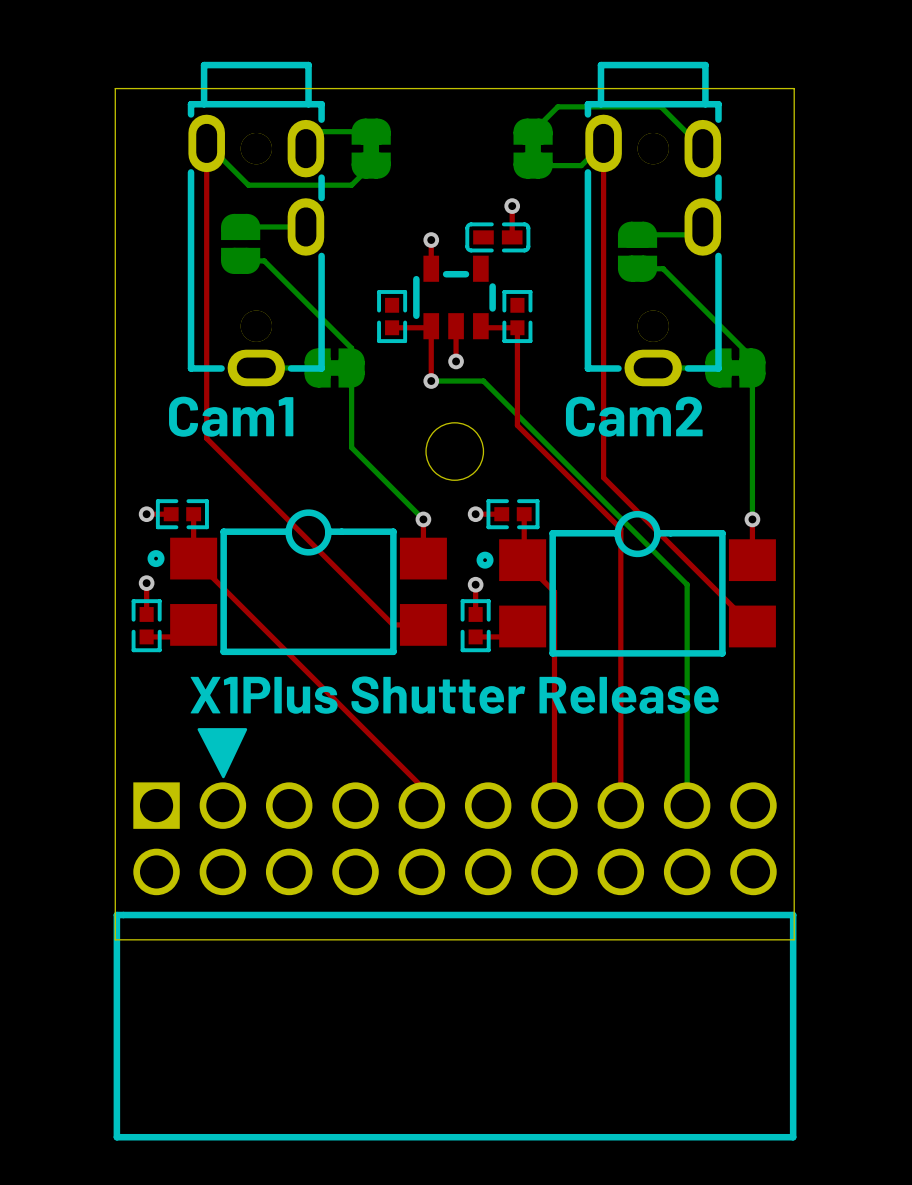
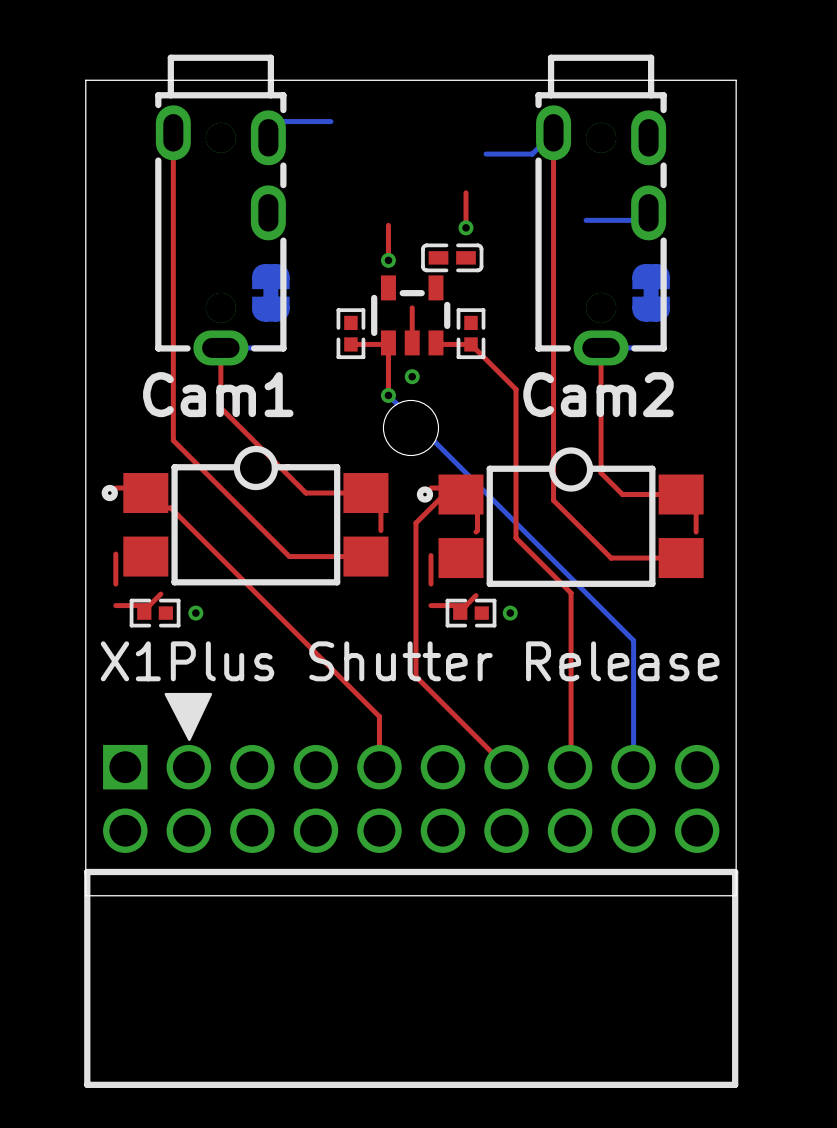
bottom track: (533, 131) (557, 106) (661, 106) (702, 148) -> none
bottom track: (206, 143) (248, 185) (351, 185) (371, 165) -> none
part: (371, 148) -> none
part: (533, 148) -> none
via position: (512, 206) -> (466, 227)
bottom track: (240, 226) (305, 226) -> none
part position: (497, 237) -> (452, 257)
via position: (431, 240) -> (388, 260)
part: (240, 243) -> none
part: (637, 251) -> none
bottom track: (240, 260) (264, 260) (351, 348) (351, 447) (423, 519) -> none
bottom track: (637, 268) (663, 268) (752, 358) (752, 519) -> none
part position: (454, 297) -> (410, 315)
part position: (392, 316) -> (350, 333)
part position: (517, 316) -> (471, 333)
top track: (480, 326) (517, 327) (517, 425) (620, 528) (620, 805) -> none
top track: (392, 327) (429, 327) (431, 326) (431, 362) -> (350, 344) (388, 342)
via: (456, 361) -> none
top track: none -> (435, 342) (471, 344) (516, 389) (516, 538) (571, 593) (571, 766)
part rotation: 0° (334, 367) -> 90° clockwise (270, 292)
part position: (334, 367) -> (270, 292)
part rotation: 0° (735, 367) -> 90° clockwise (651, 292)
part position: (735, 367) -> (651, 292)
top track: none -> (601, 350) (601, 473) (622, 494) (681, 494)
top track: none -> (220, 352) (220, 407) (305, 493) (365, 493)
top track: none -> (388, 360) (388, 395)
bottom track: (431, 381) (483, 381) (687, 584) (687, 673) -> (388, 395) (633, 640)
via: (431, 381) -> none
via: none -> (412, 376)
via: none -> (388, 395)
top track: (206, 438) (393, 624) (423, 624) -> (173, 415) (173, 440) (289, 556) (365, 556)
top track: (603, 477) (752, 626) -> (553, 452) (553, 500) (611, 558) (681, 558)
via: (146, 514) -> none
part: (182, 514) -> none
top track: (193, 514) (193, 558) (421, 786) -> (145, 508) (170, 508) (379, 716) (379, 749)
via: (475, 514) -> none
part: (512, 514) -> none
via: (423, 519) -> none
via: (752, 519) -> none
top track: (505, 560) (522, 560) (554, 592) (554, 805) -> (461, 494) (444, 494) (415, 523) (415, 676) (506, 767)
part position: (297, 582) -> (245, 515)
via: (146, 583) -> none
part position: (626, 583) -> (560, 517)
via: (475, 584) -> none
part rotation: 0° (146, 625) -> 90° clockwise (155, 613)
part position: (146, 625) -> (155, 613)
part rotation: 0° (475, 625) -> 90° clockwise (471, 613)
part position: (475, 625) -> (471, 613)
via: none -> (195, 613)
via: none -> (510, 613)

